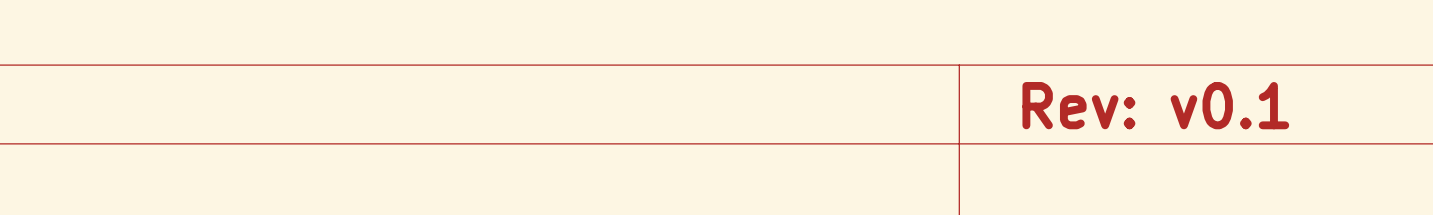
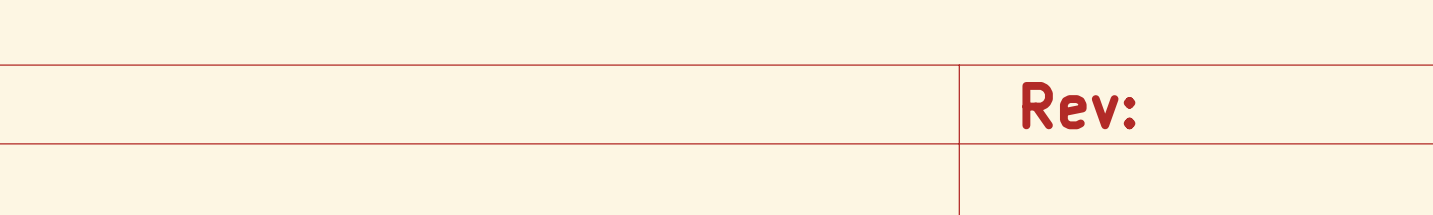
title block: Rev: v0.1 (1155, 105) -> Rev: (1078, 105)

